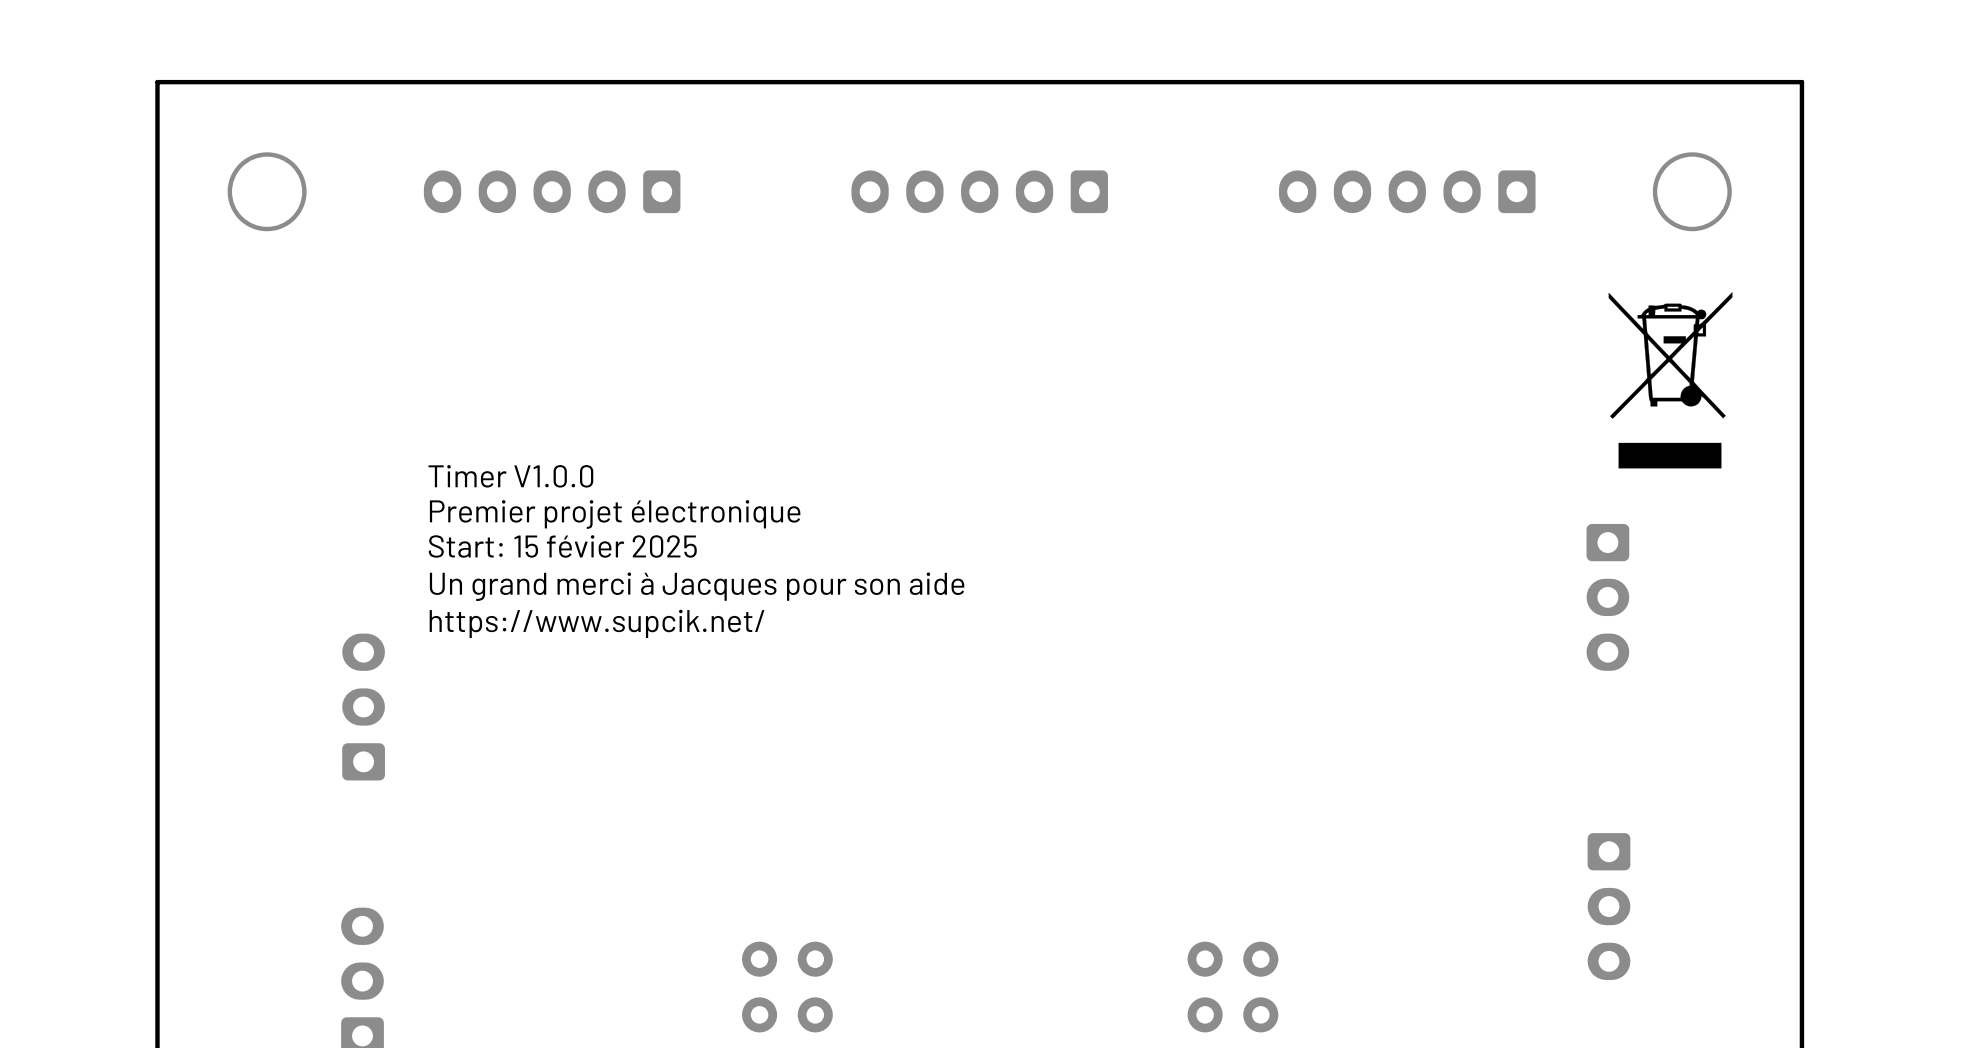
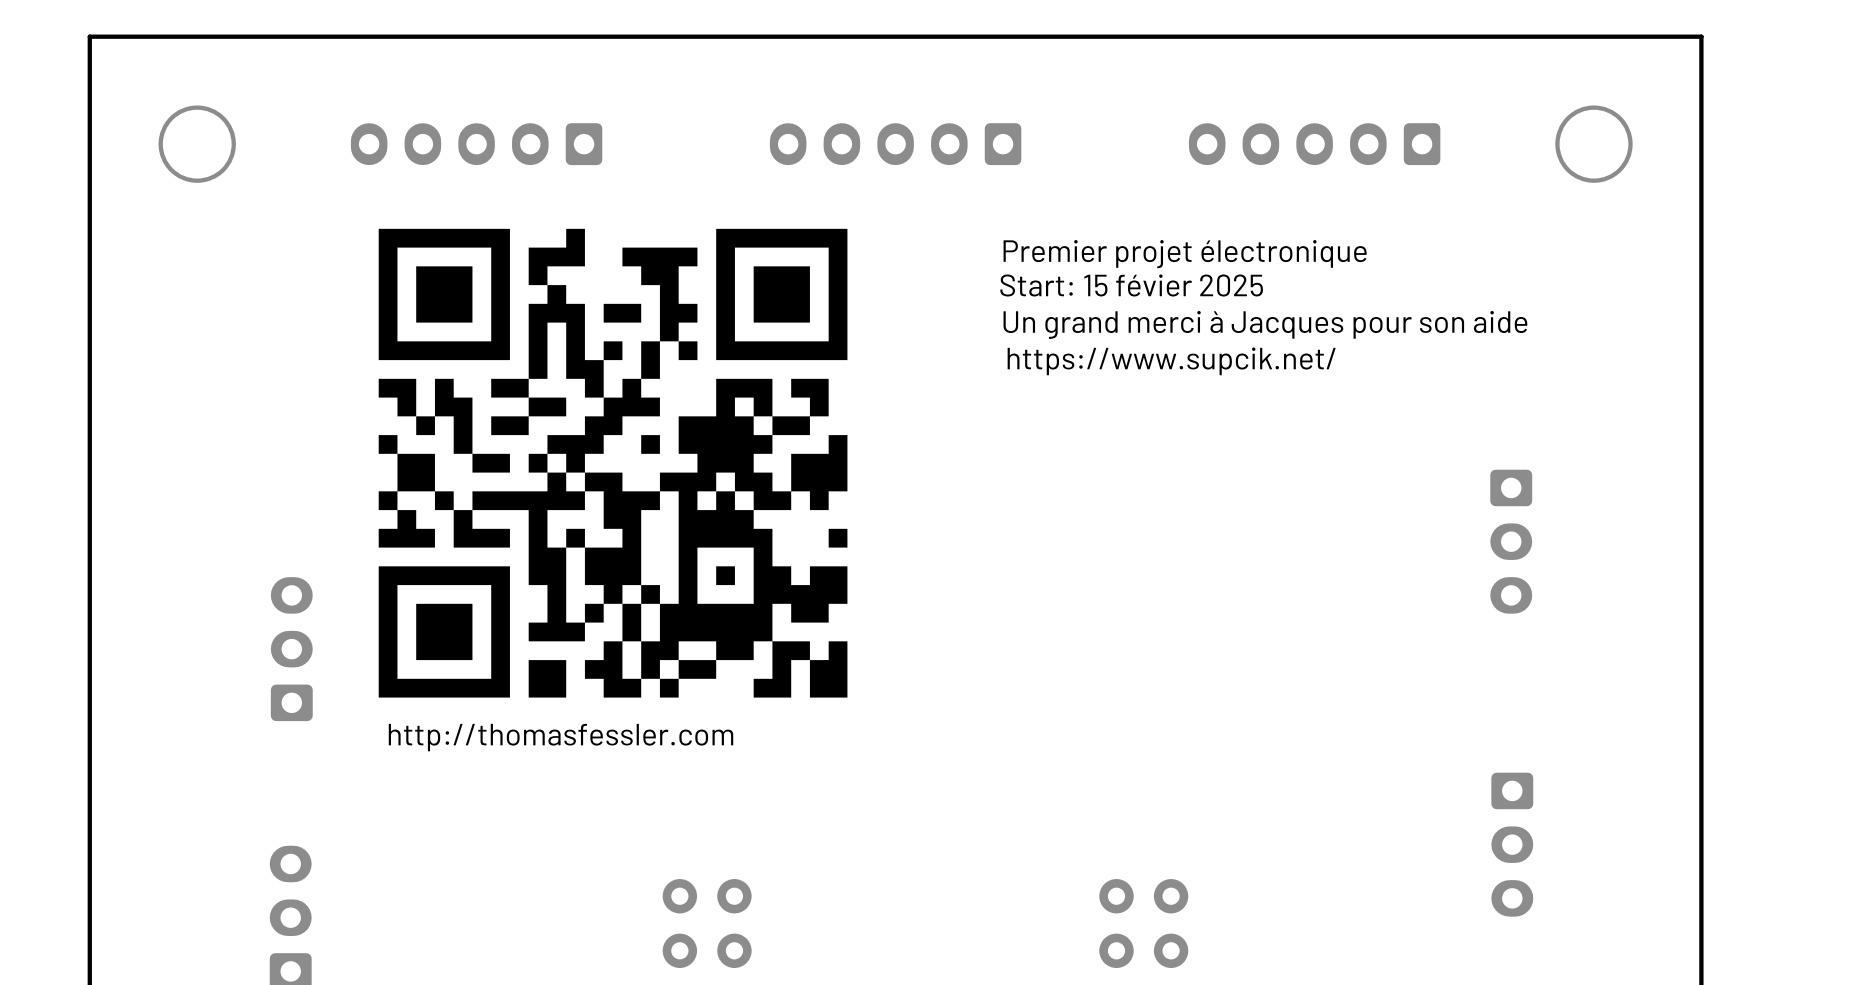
drawing: none -> [378, 228, 848, 698]
drawing: [1608, 292, 1733, 469] -> none
text: none -> Premier projet électronique (1185, 254)
text: none -> Start: 15 févier 2025 (1131, 285)
text: none -> Un grand merci à Jacques pour son aide (1265, 324)
text: none -> https://www.supcik.net/ (1171, 361)
text: Timer V1.0.0 (510, 476) -> none
text: Premier projet électronique (615, 514) -> none
text: Start: 15 févier 2025 (562, 546) -> none
text: Un grand merci à Jacques pour son aide (697, 586) -> none
text: https://www.supcik.net/ (597, 623) -> none
text: none -> http://thomasfessler.com (561, 737)

